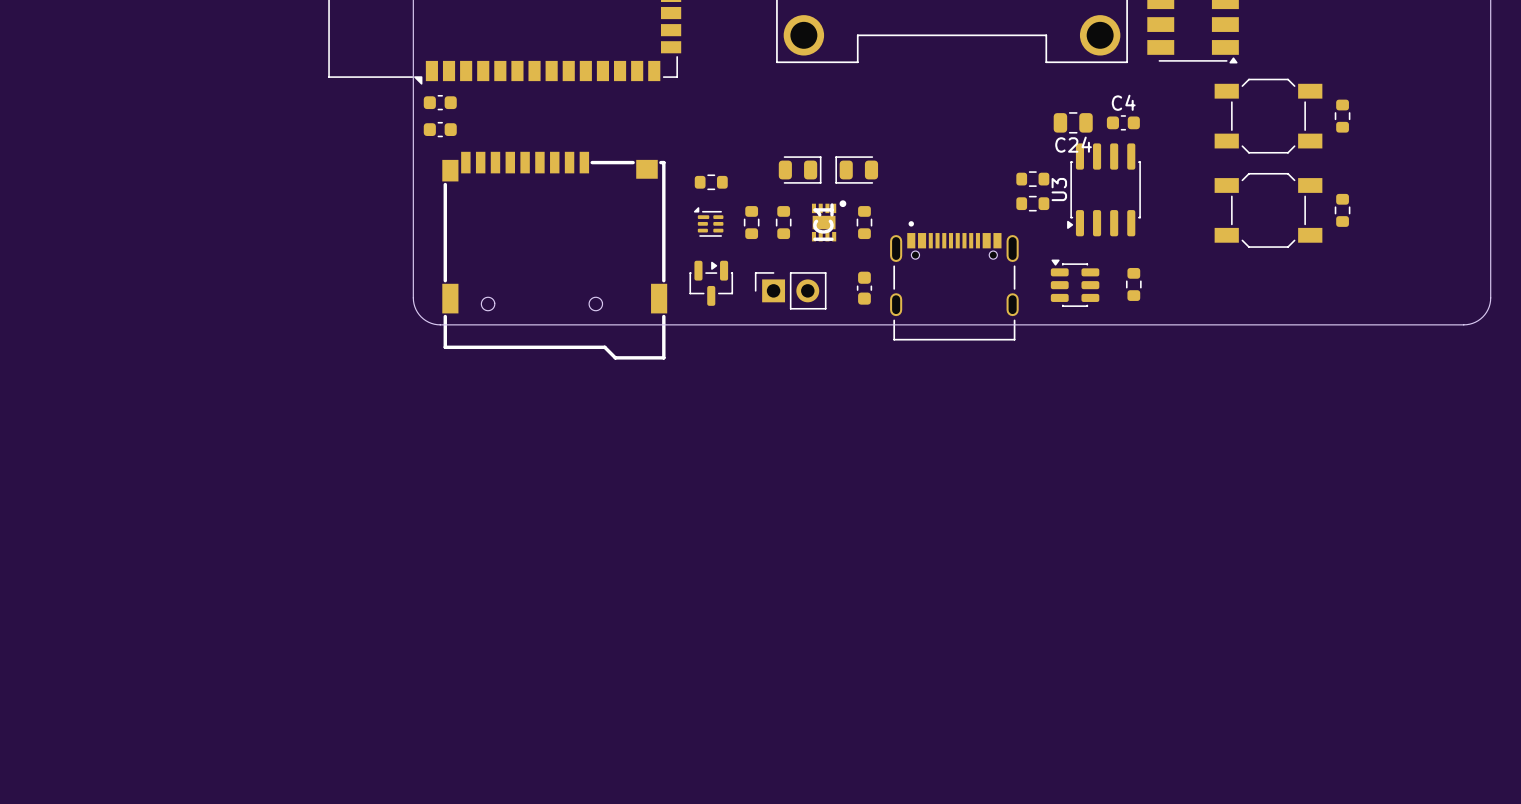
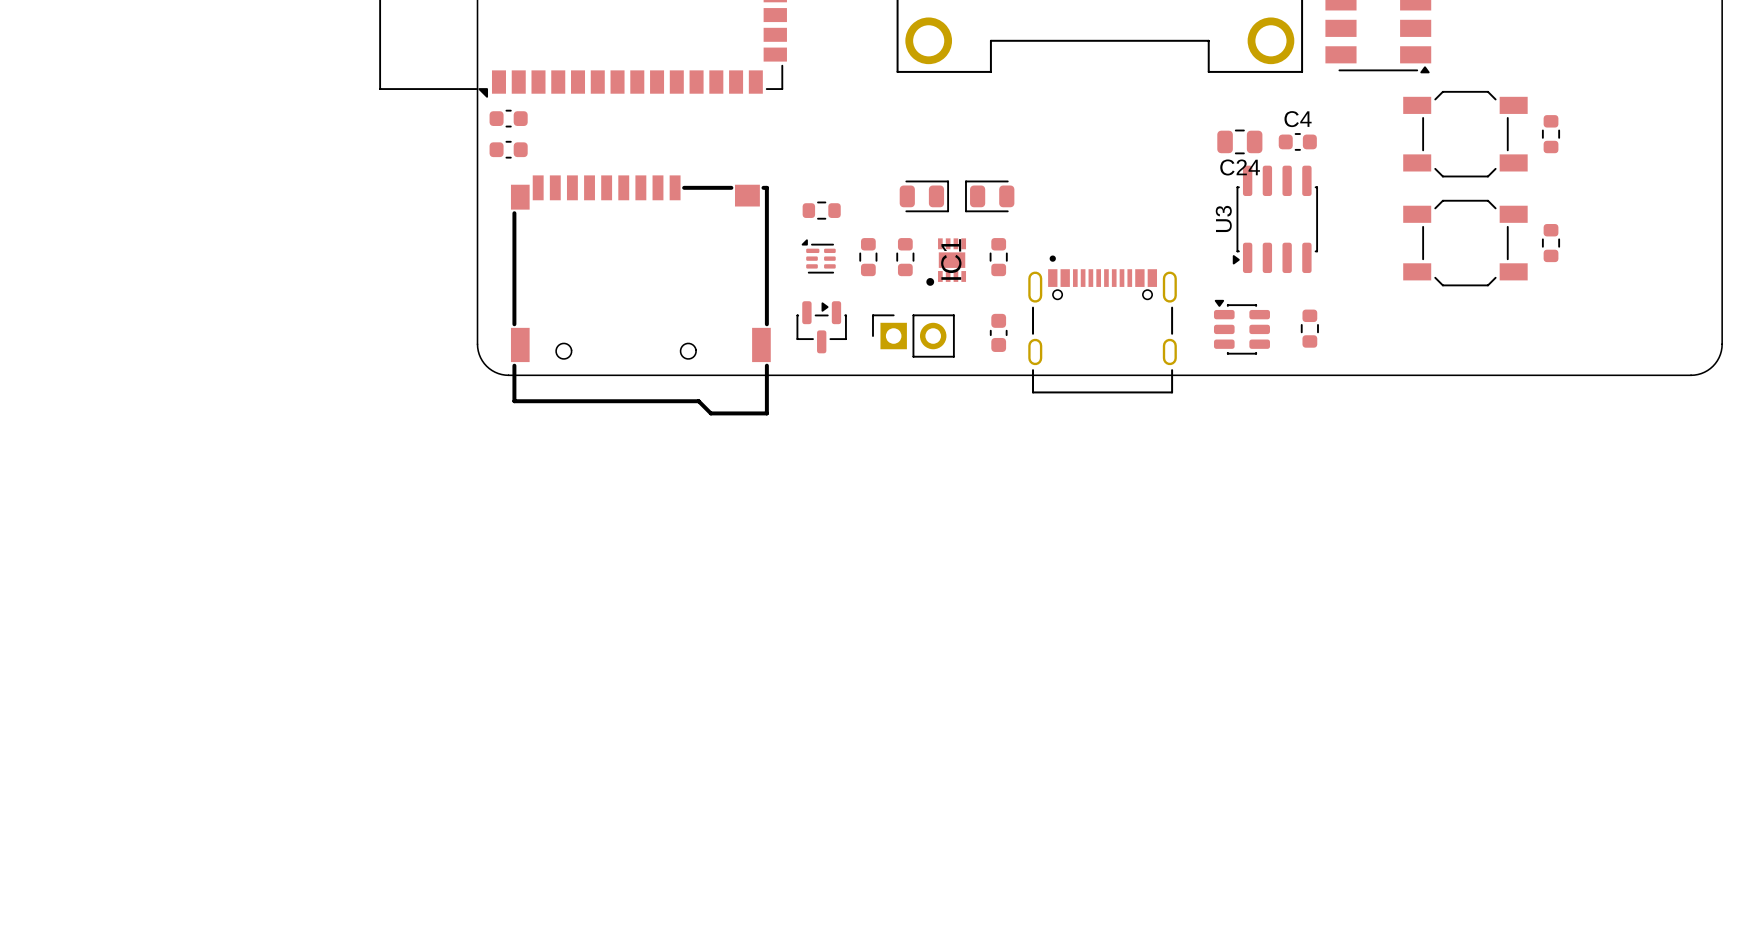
part: (1032, 179) -> none
part: (1032, 203) -> none
IC1 rotation: 0° (829, 220) -> 180° (946, 262)

